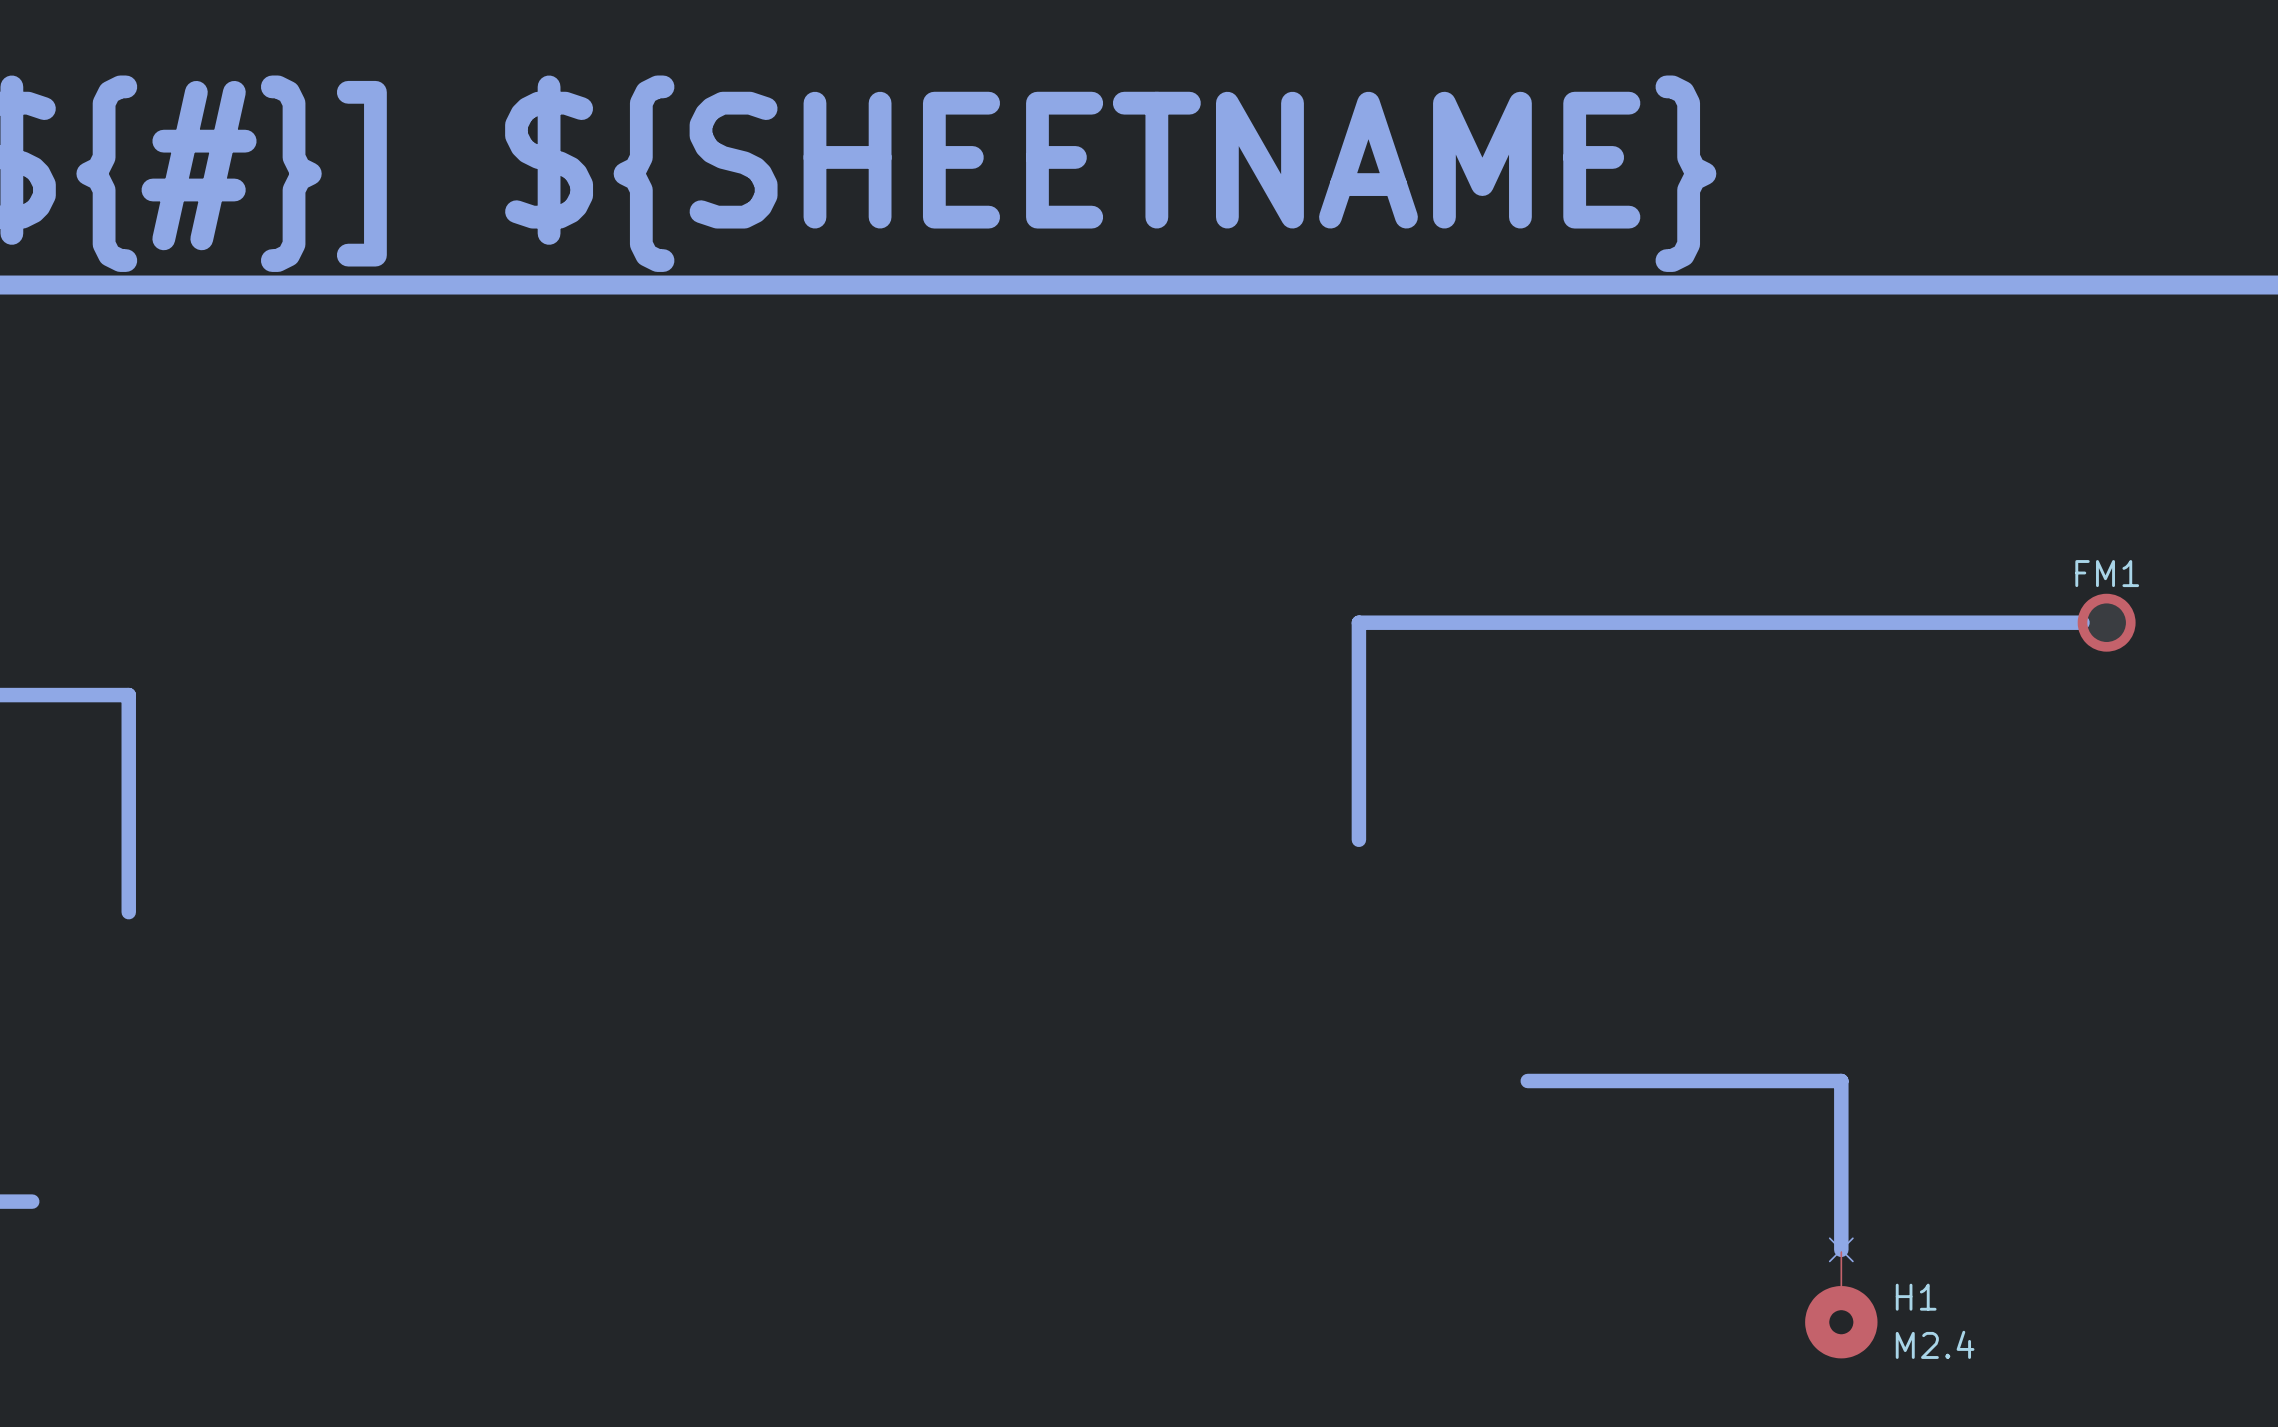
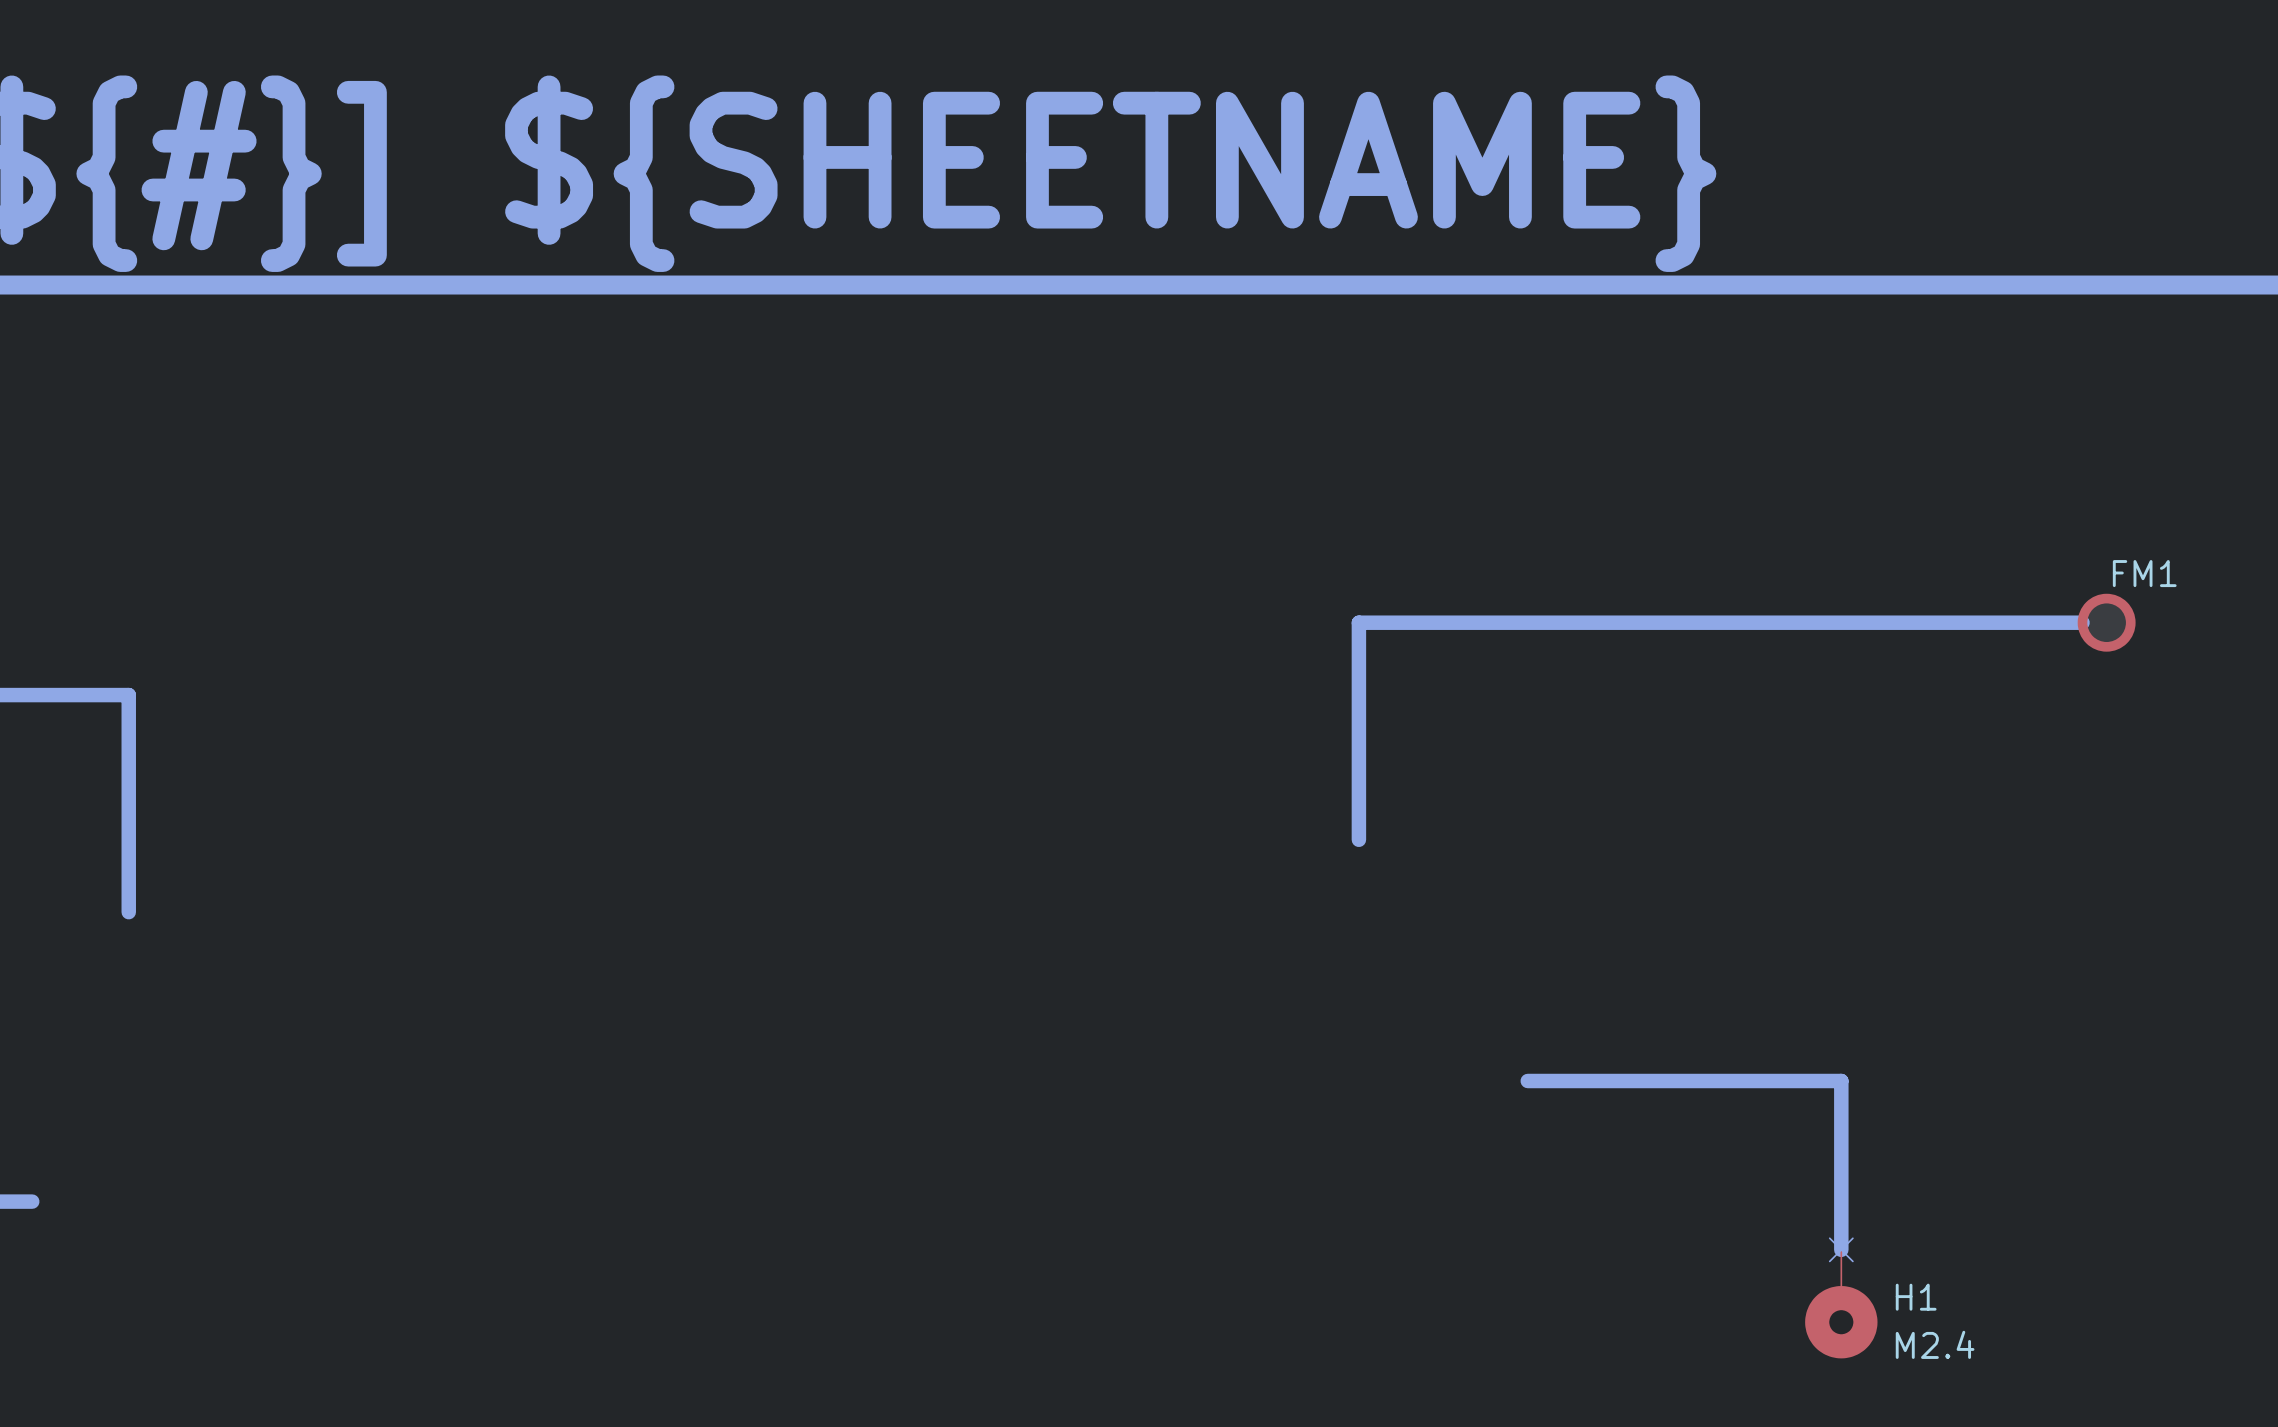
FM1 name position: FM1 (2107, 573) -> FM1 (2144, 573)

